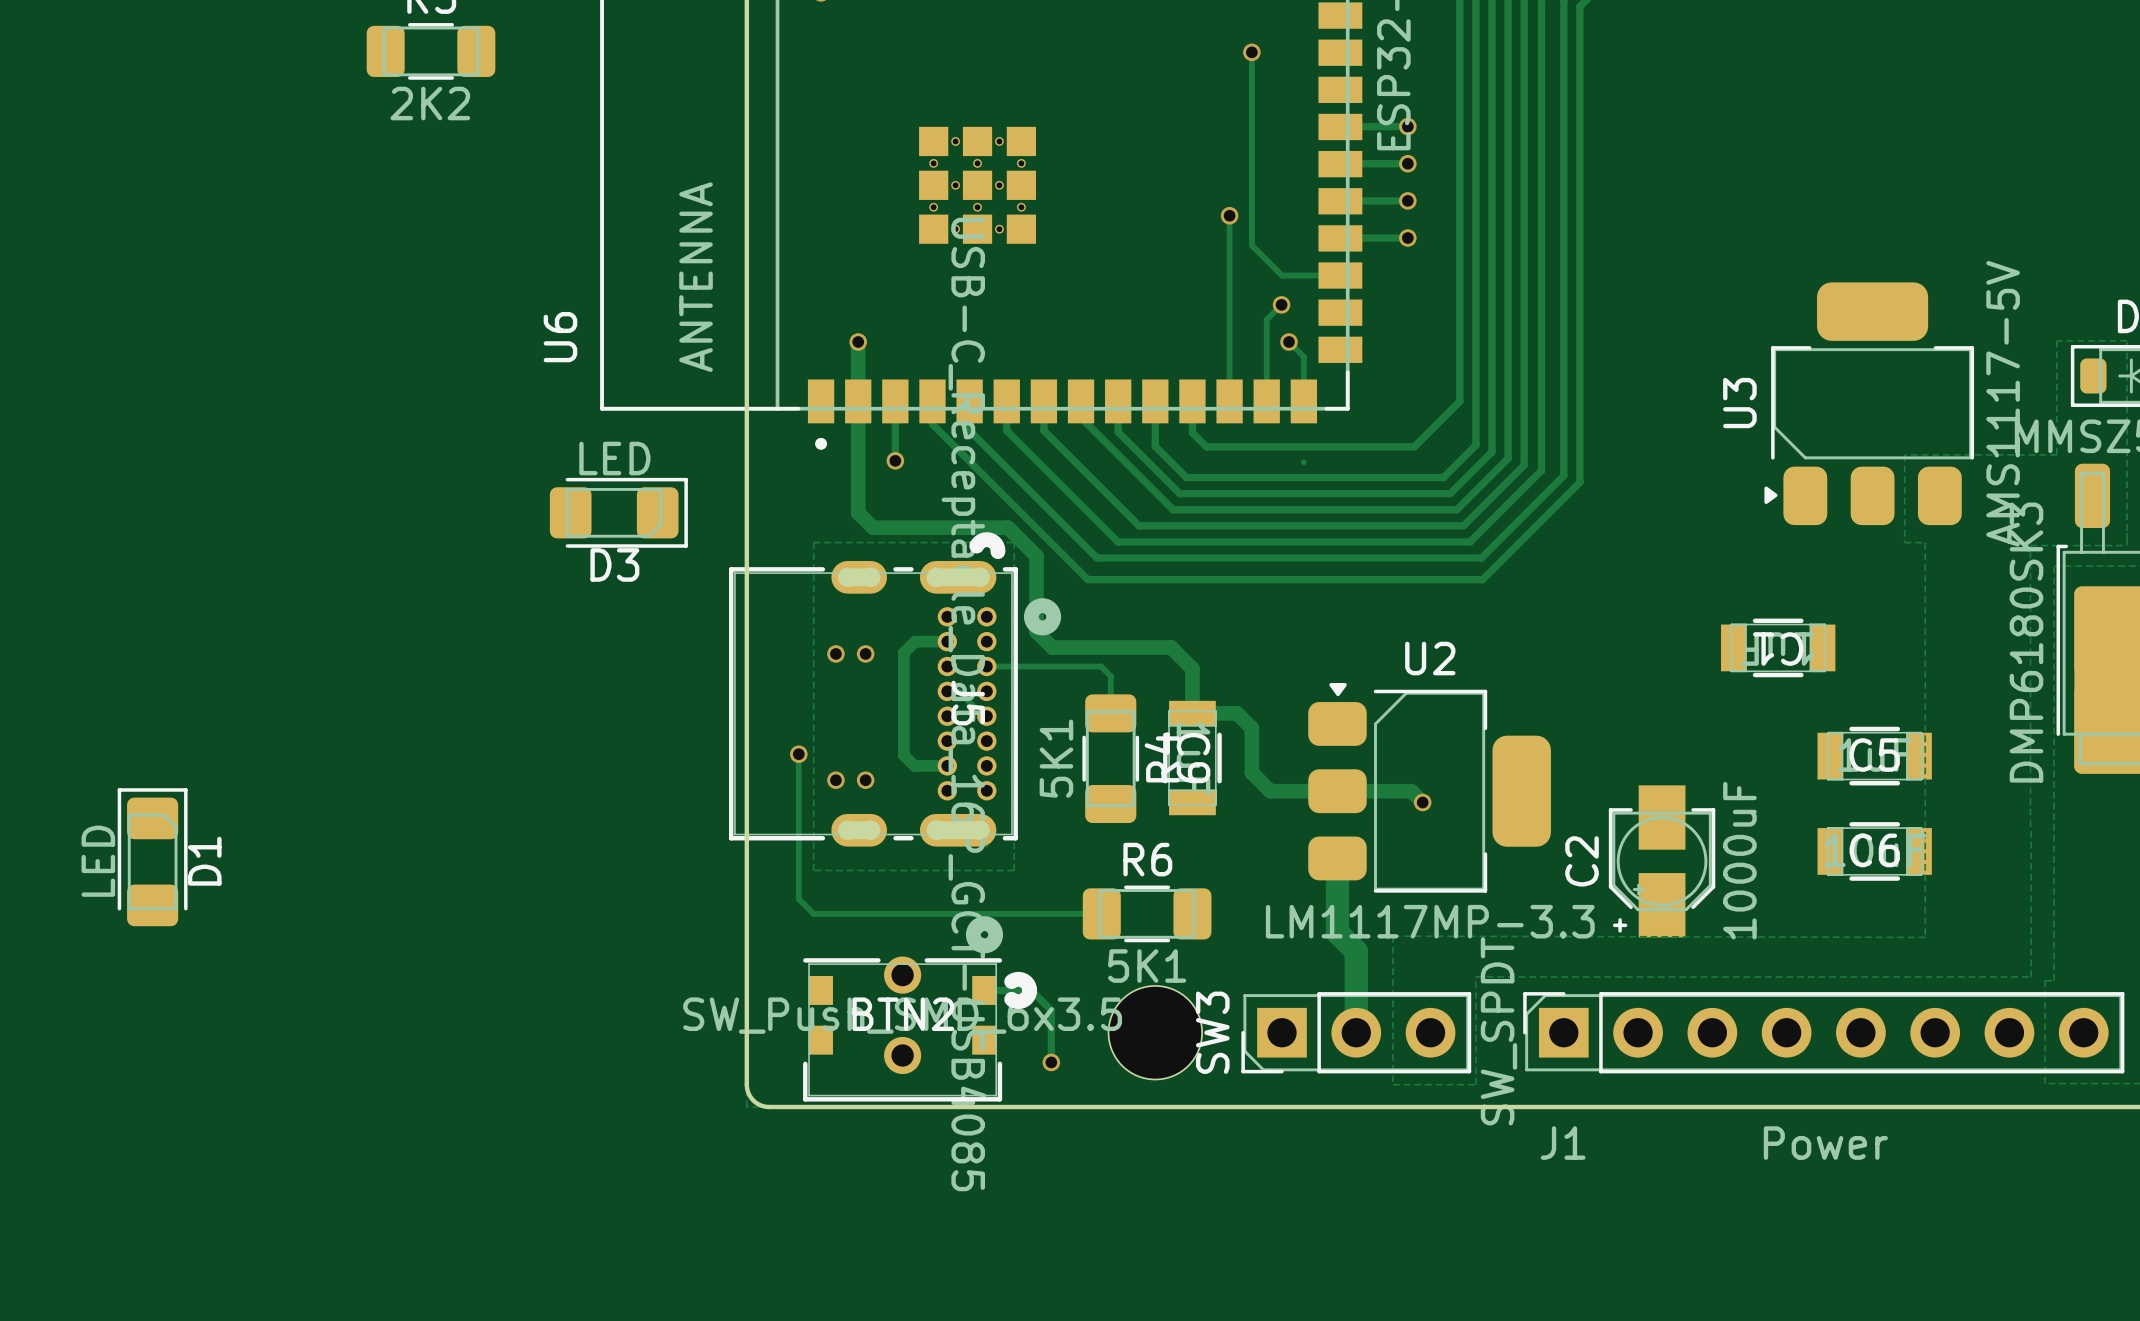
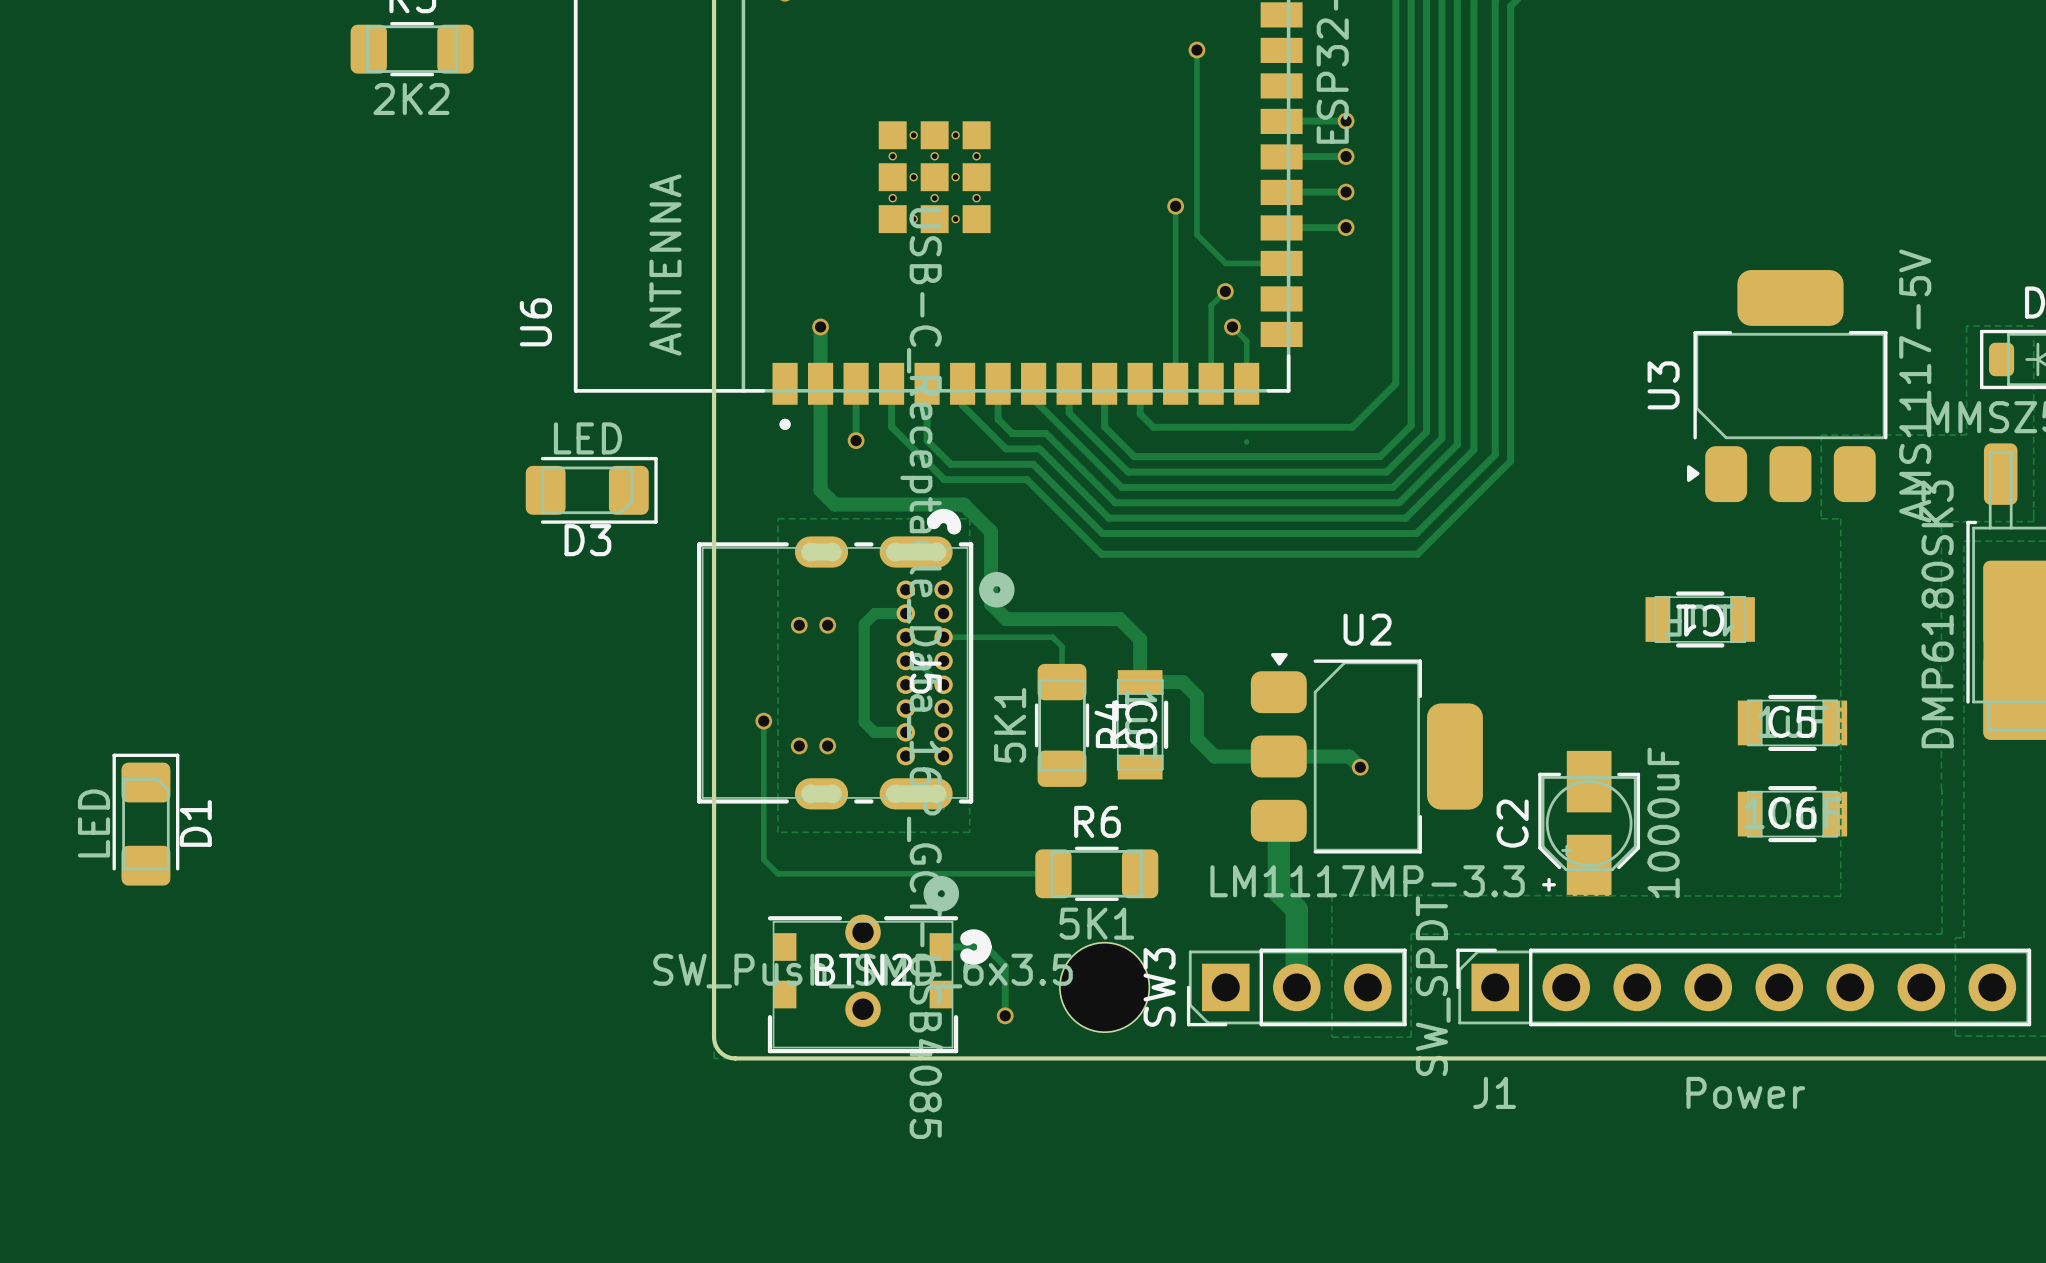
track: (932, 424) (1087, 579) (1152, 579) -> (891, 405) (891, 426) (944, 479) (1026, 479) (1101, 554)
track: (1006, 424) (1006, 430) (1118, 541) (1159, 541) -> (962, 405) (1005, 448) (1039, 448) (1108, 518)
track: (969, 430) (1096, 558) (1153, 558) -> (927, 411) (927, 440) (950, 464) (1033, 464) (1102, 533)
track: (1043, 430) (1139, 525) (1166, 525) -> (998, 411) (998, 419) (1012, 433) (1046, 433) (1115, 502)

